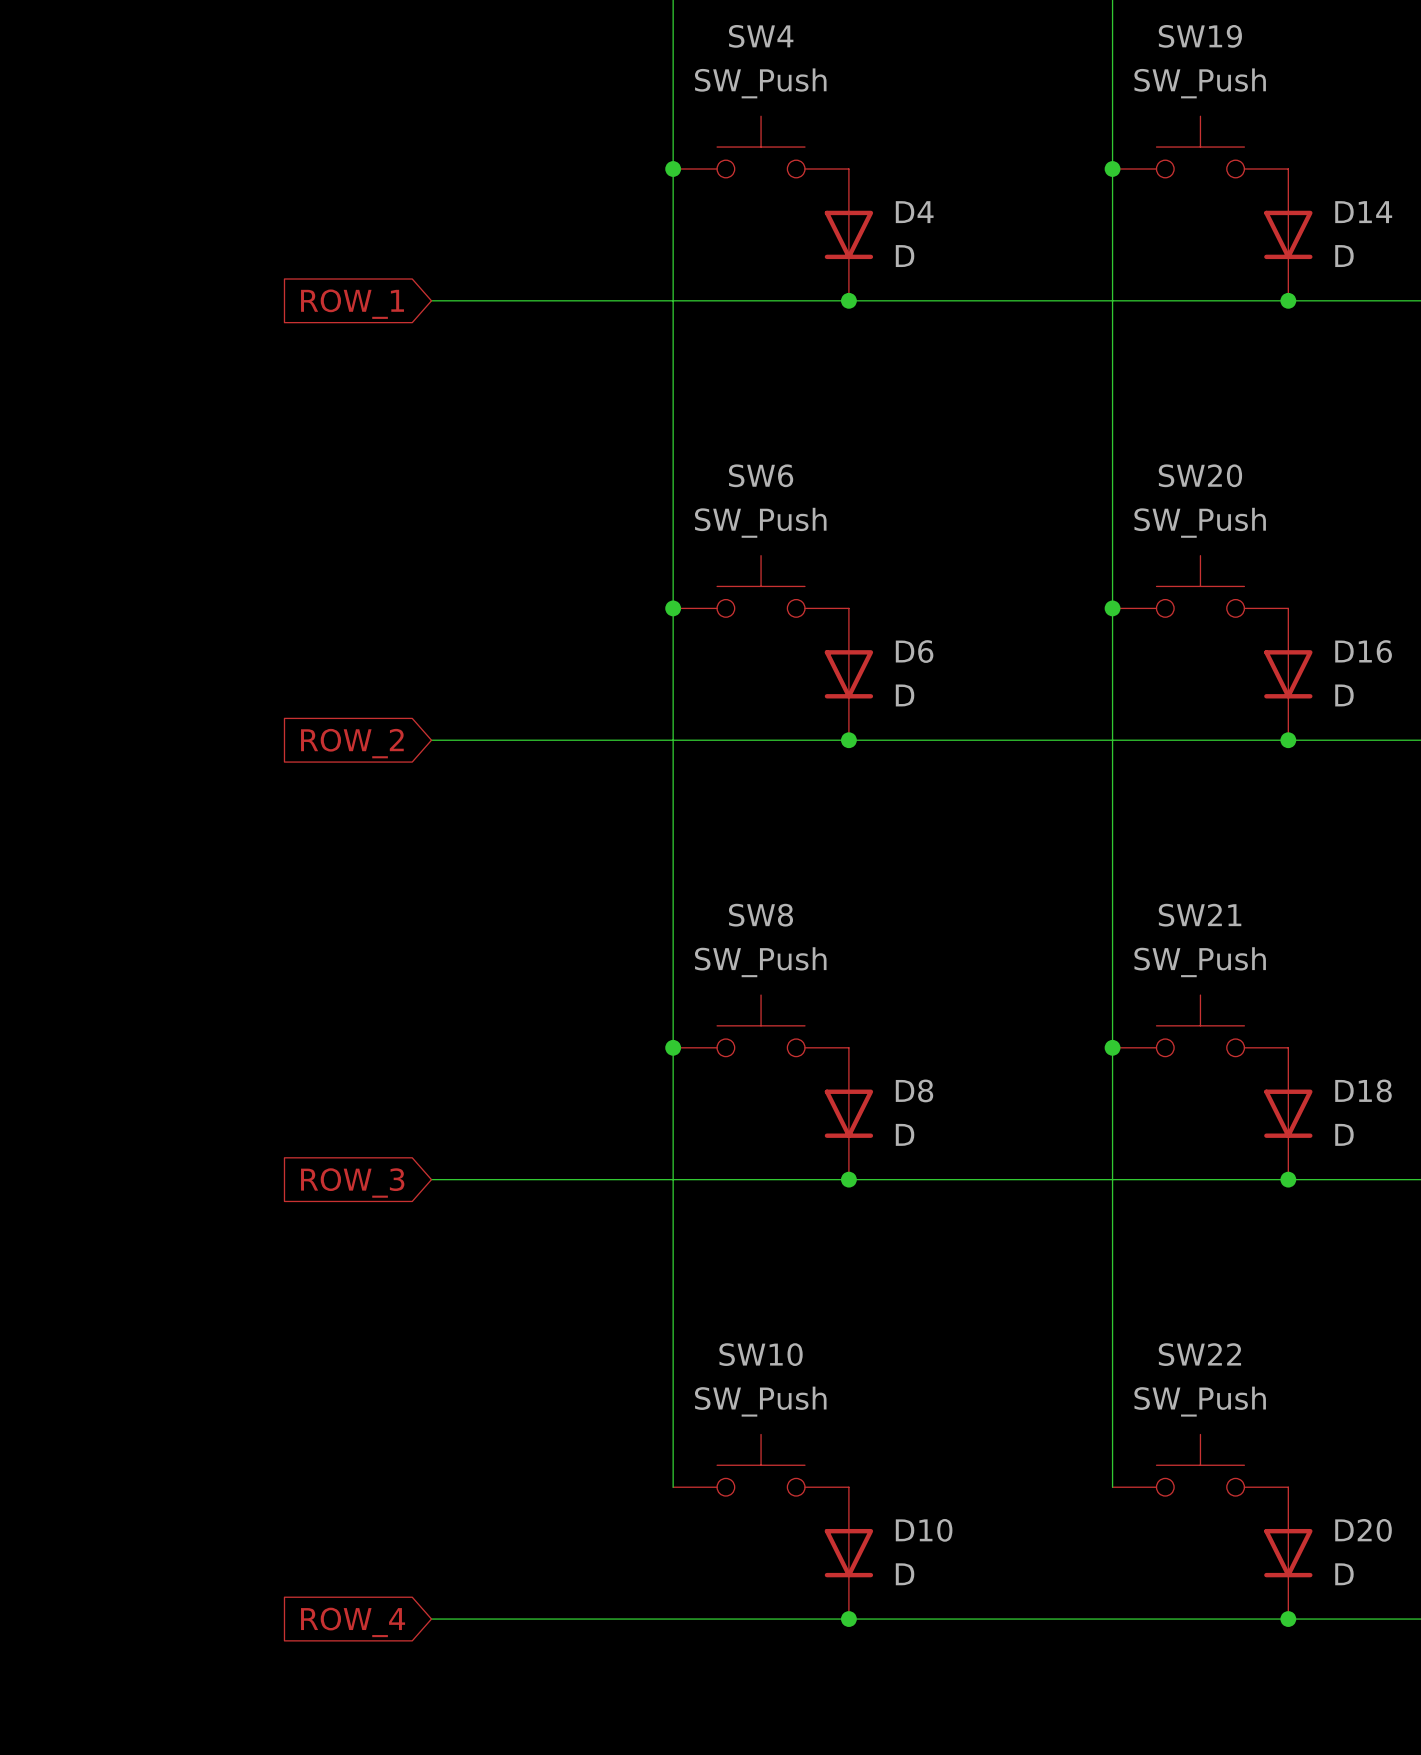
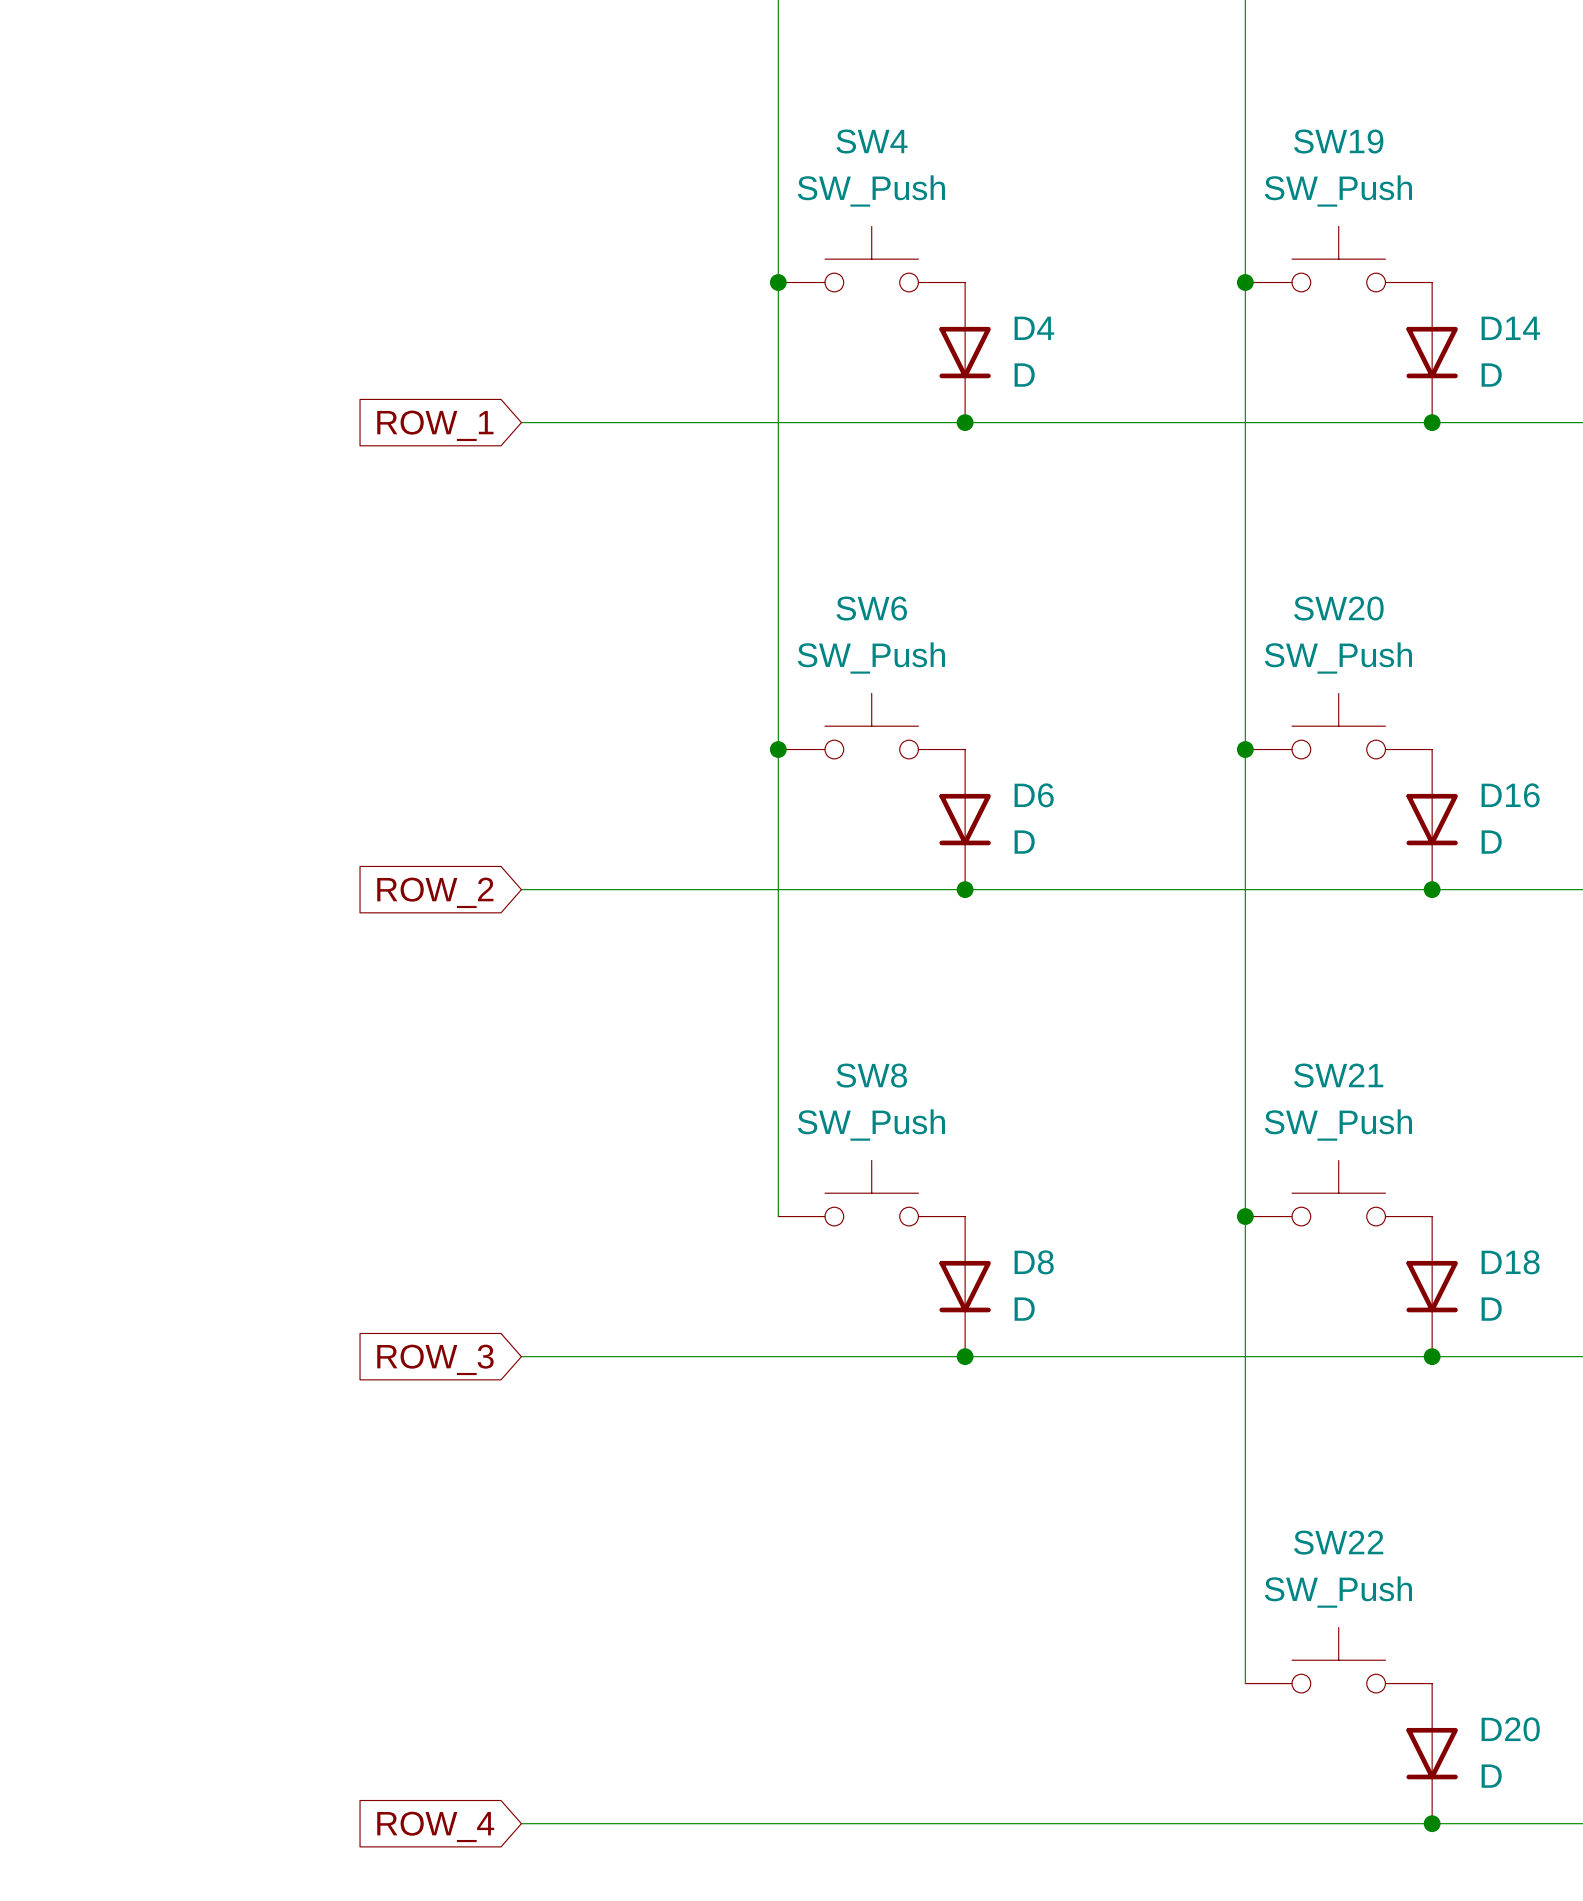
wire: (673, 1047) (673, 1487) -> none
junction: (673, 1047) -> none
SW10: SW_Push (761, 1465) -> none
D10: D (848, 1553) -> none
junction: (848, 1619) -> none

